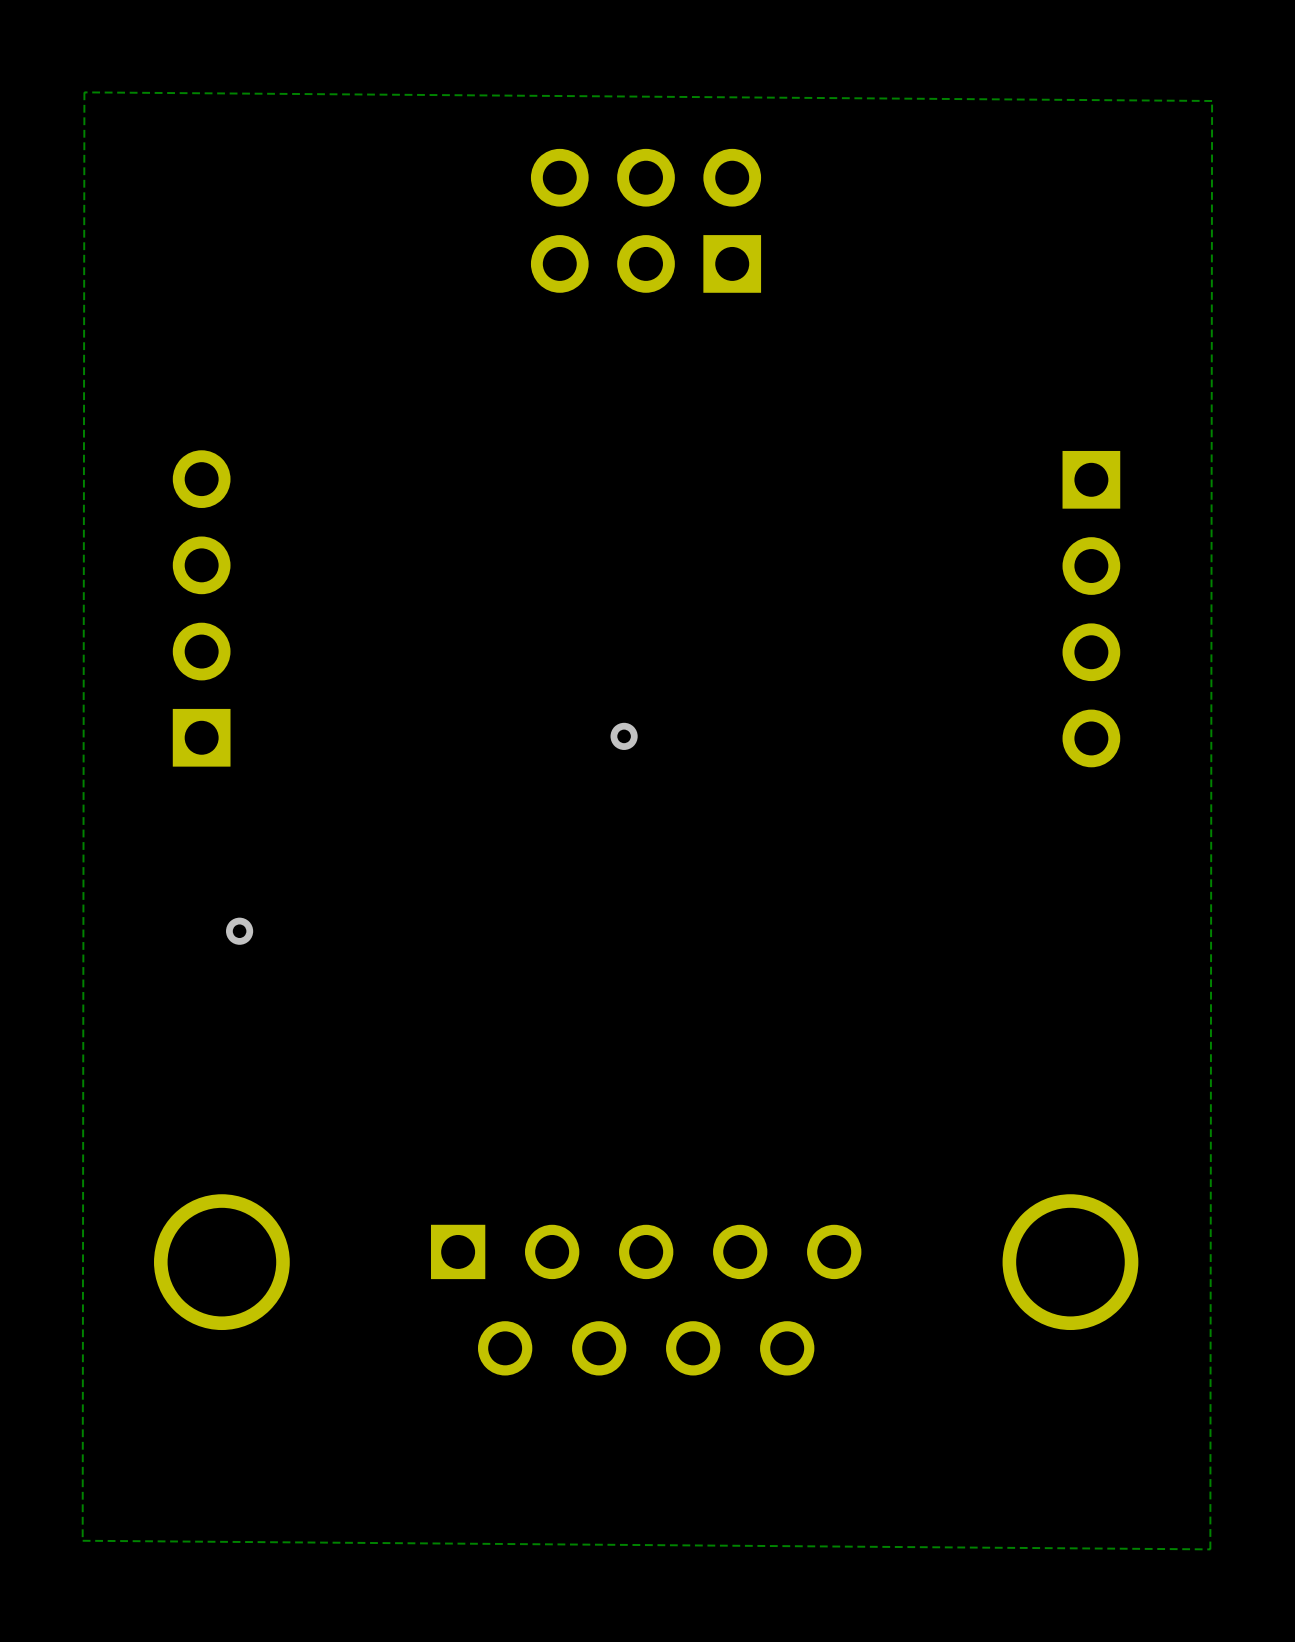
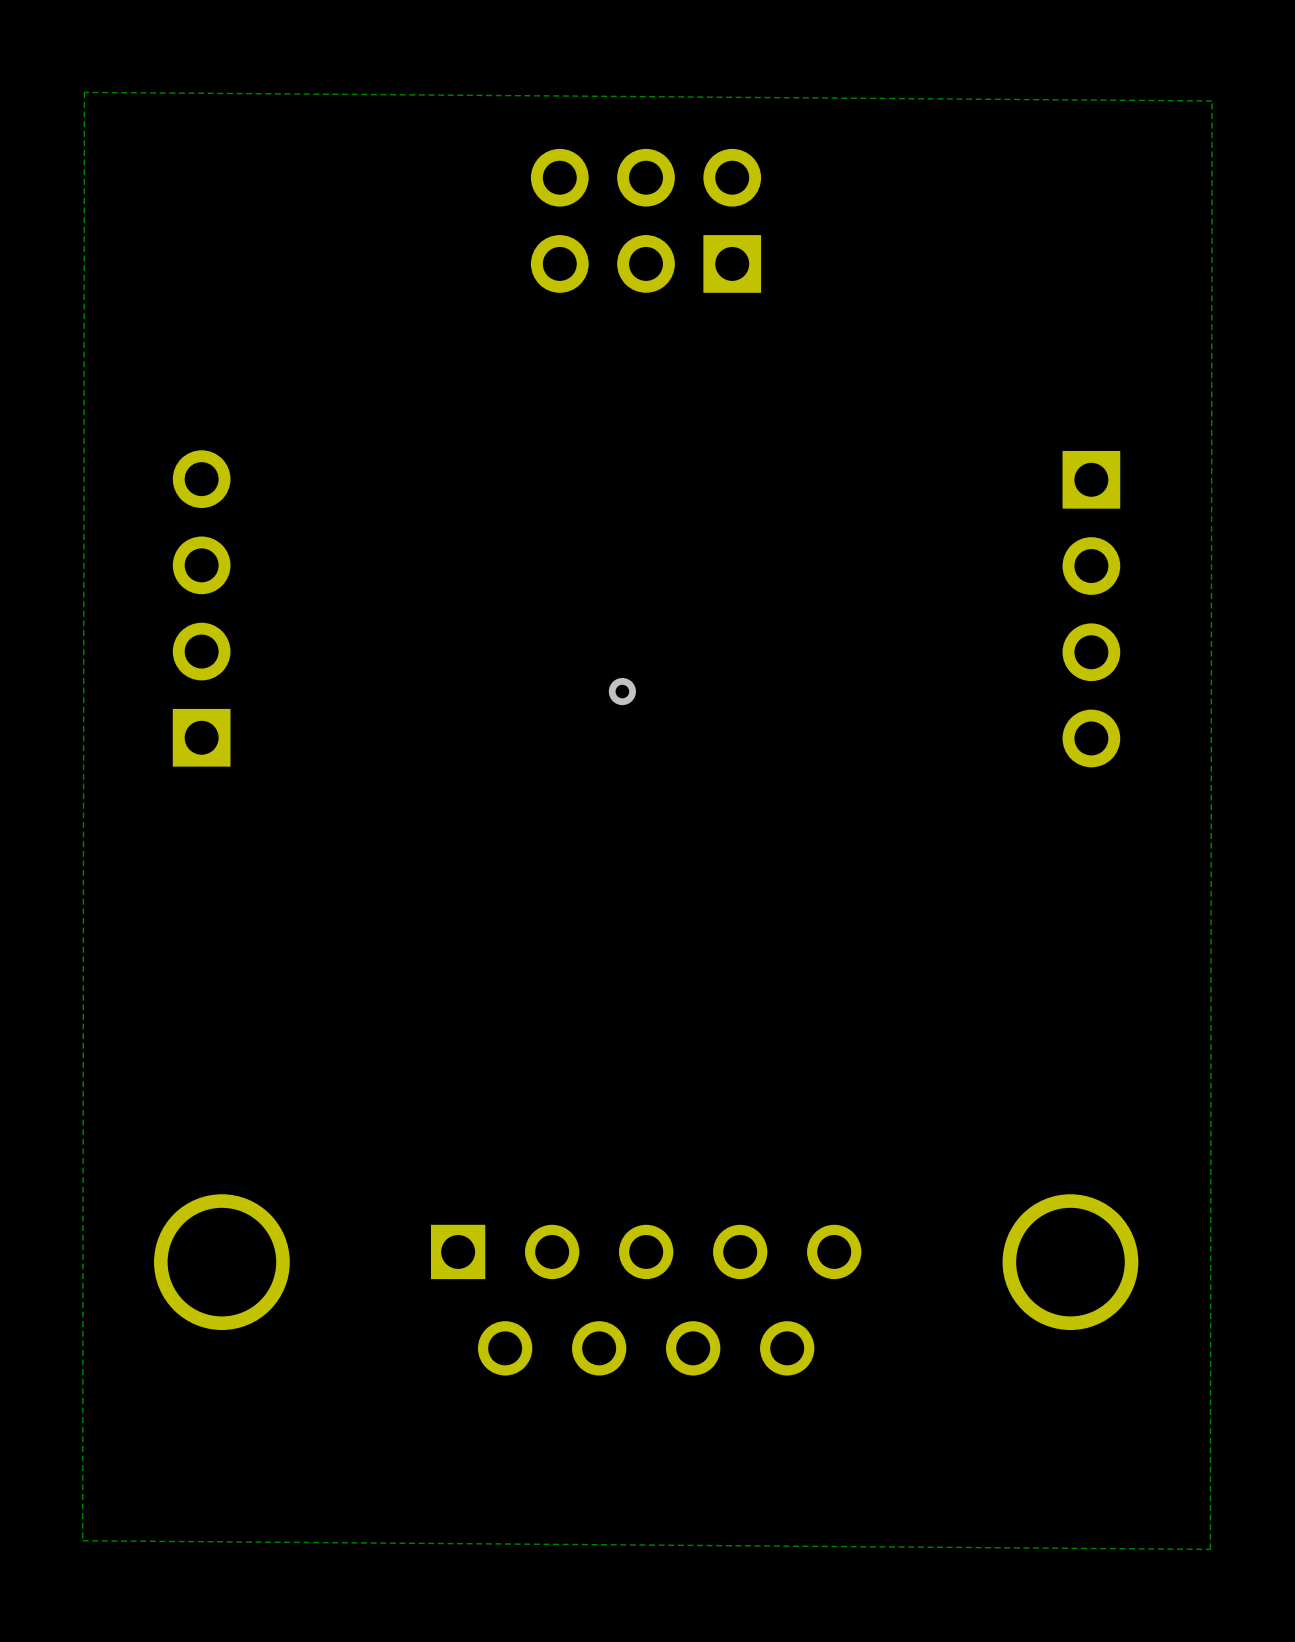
via position: (624, 736) -> (622, 691)
via: (239, 931) -> none

